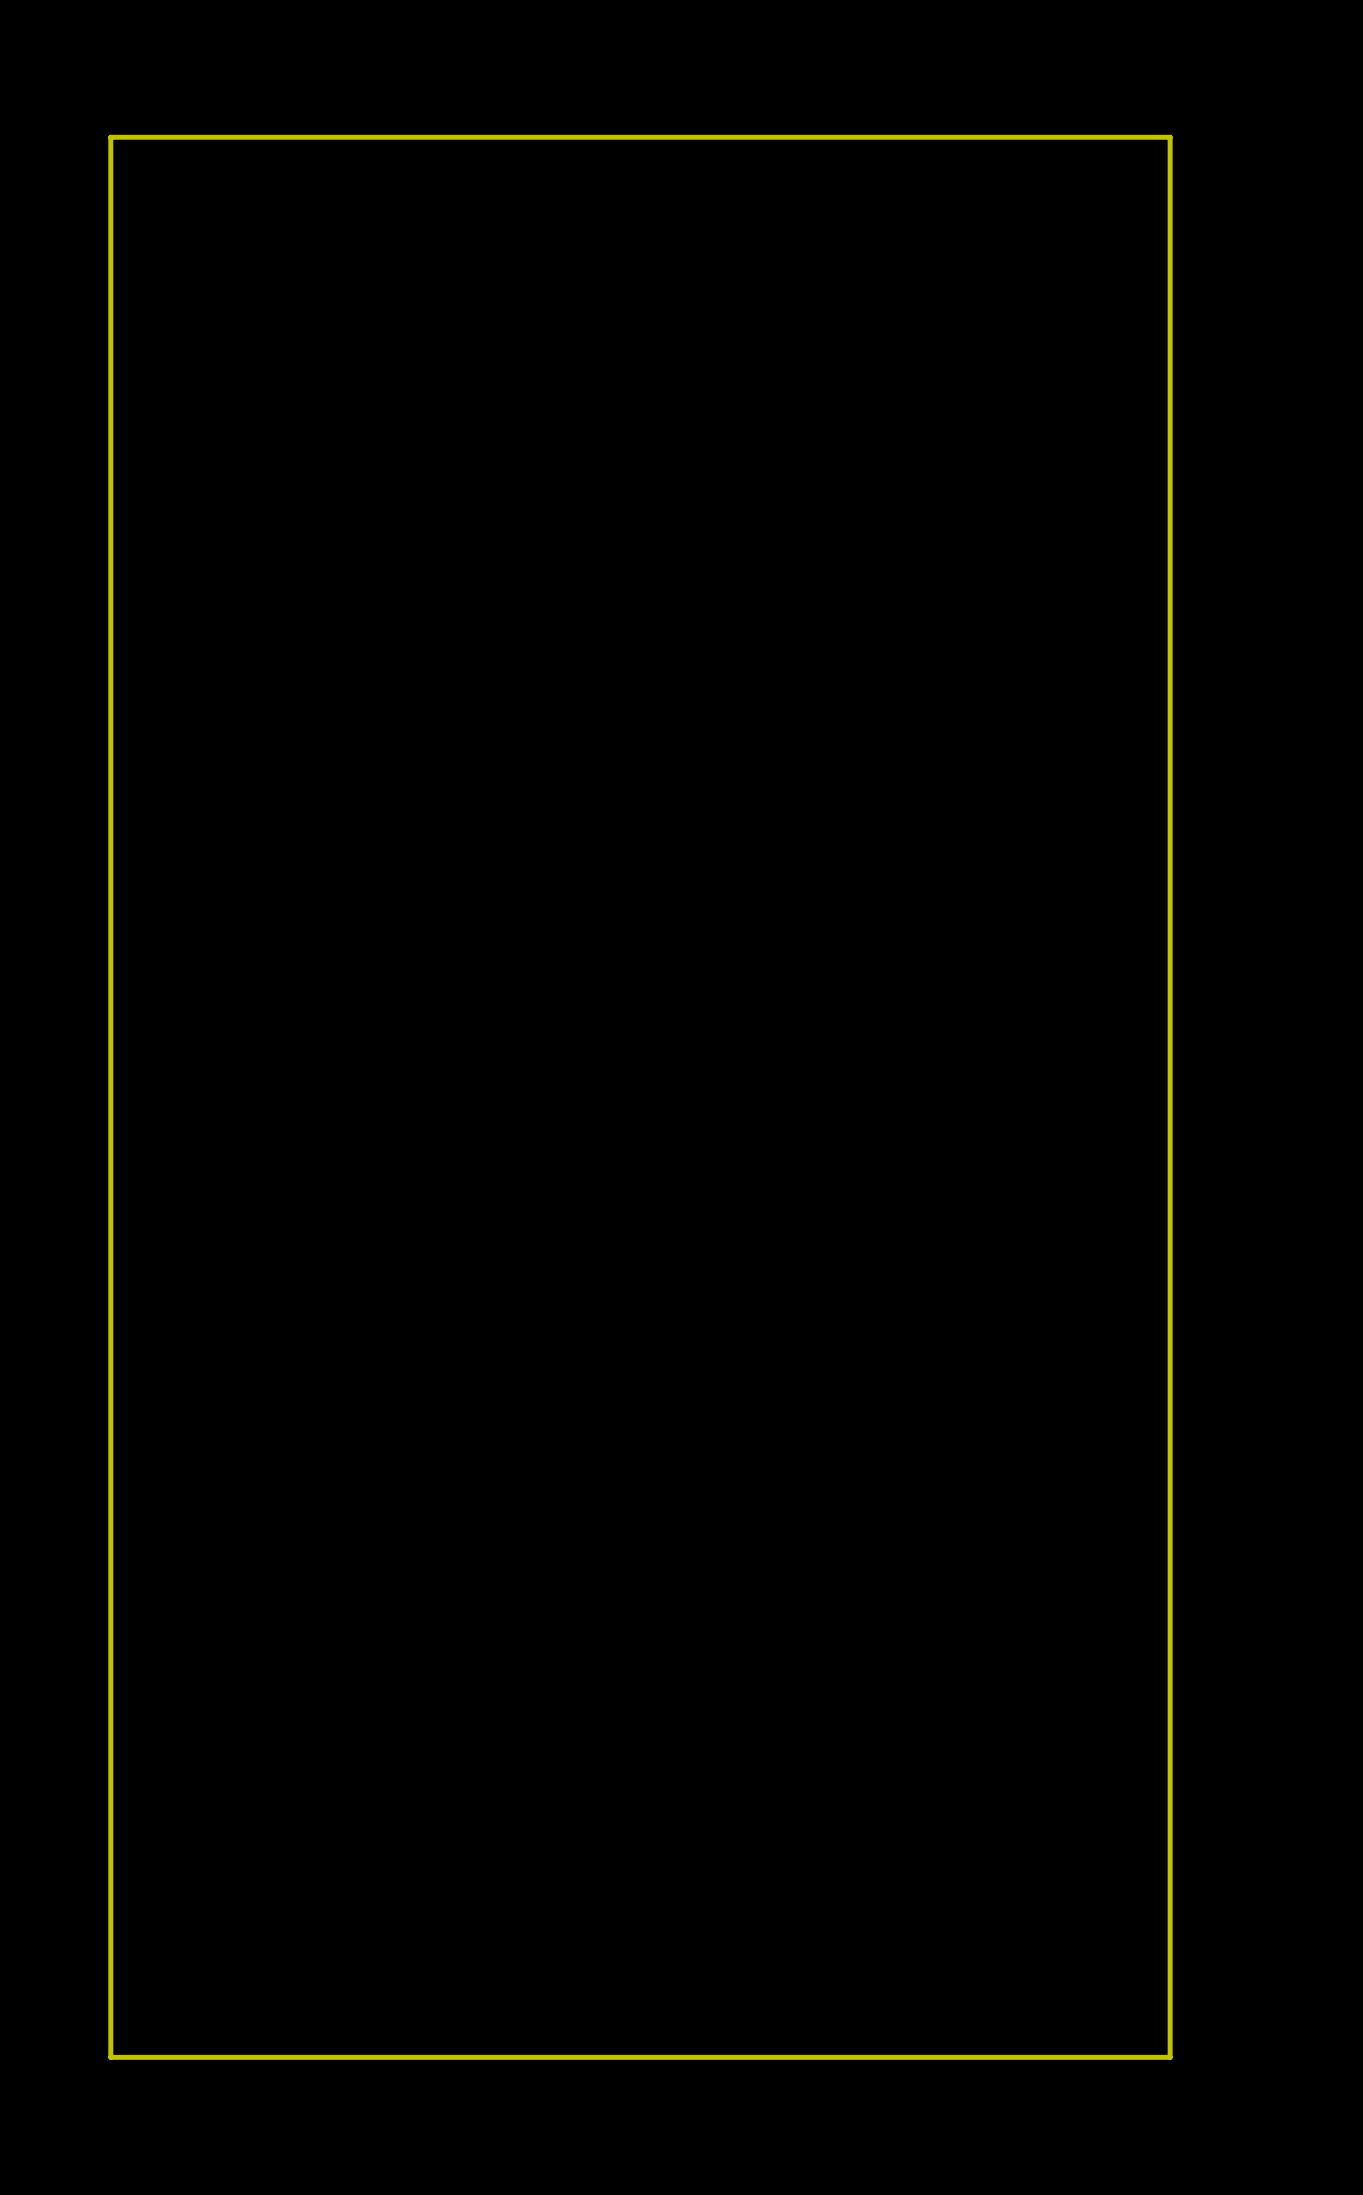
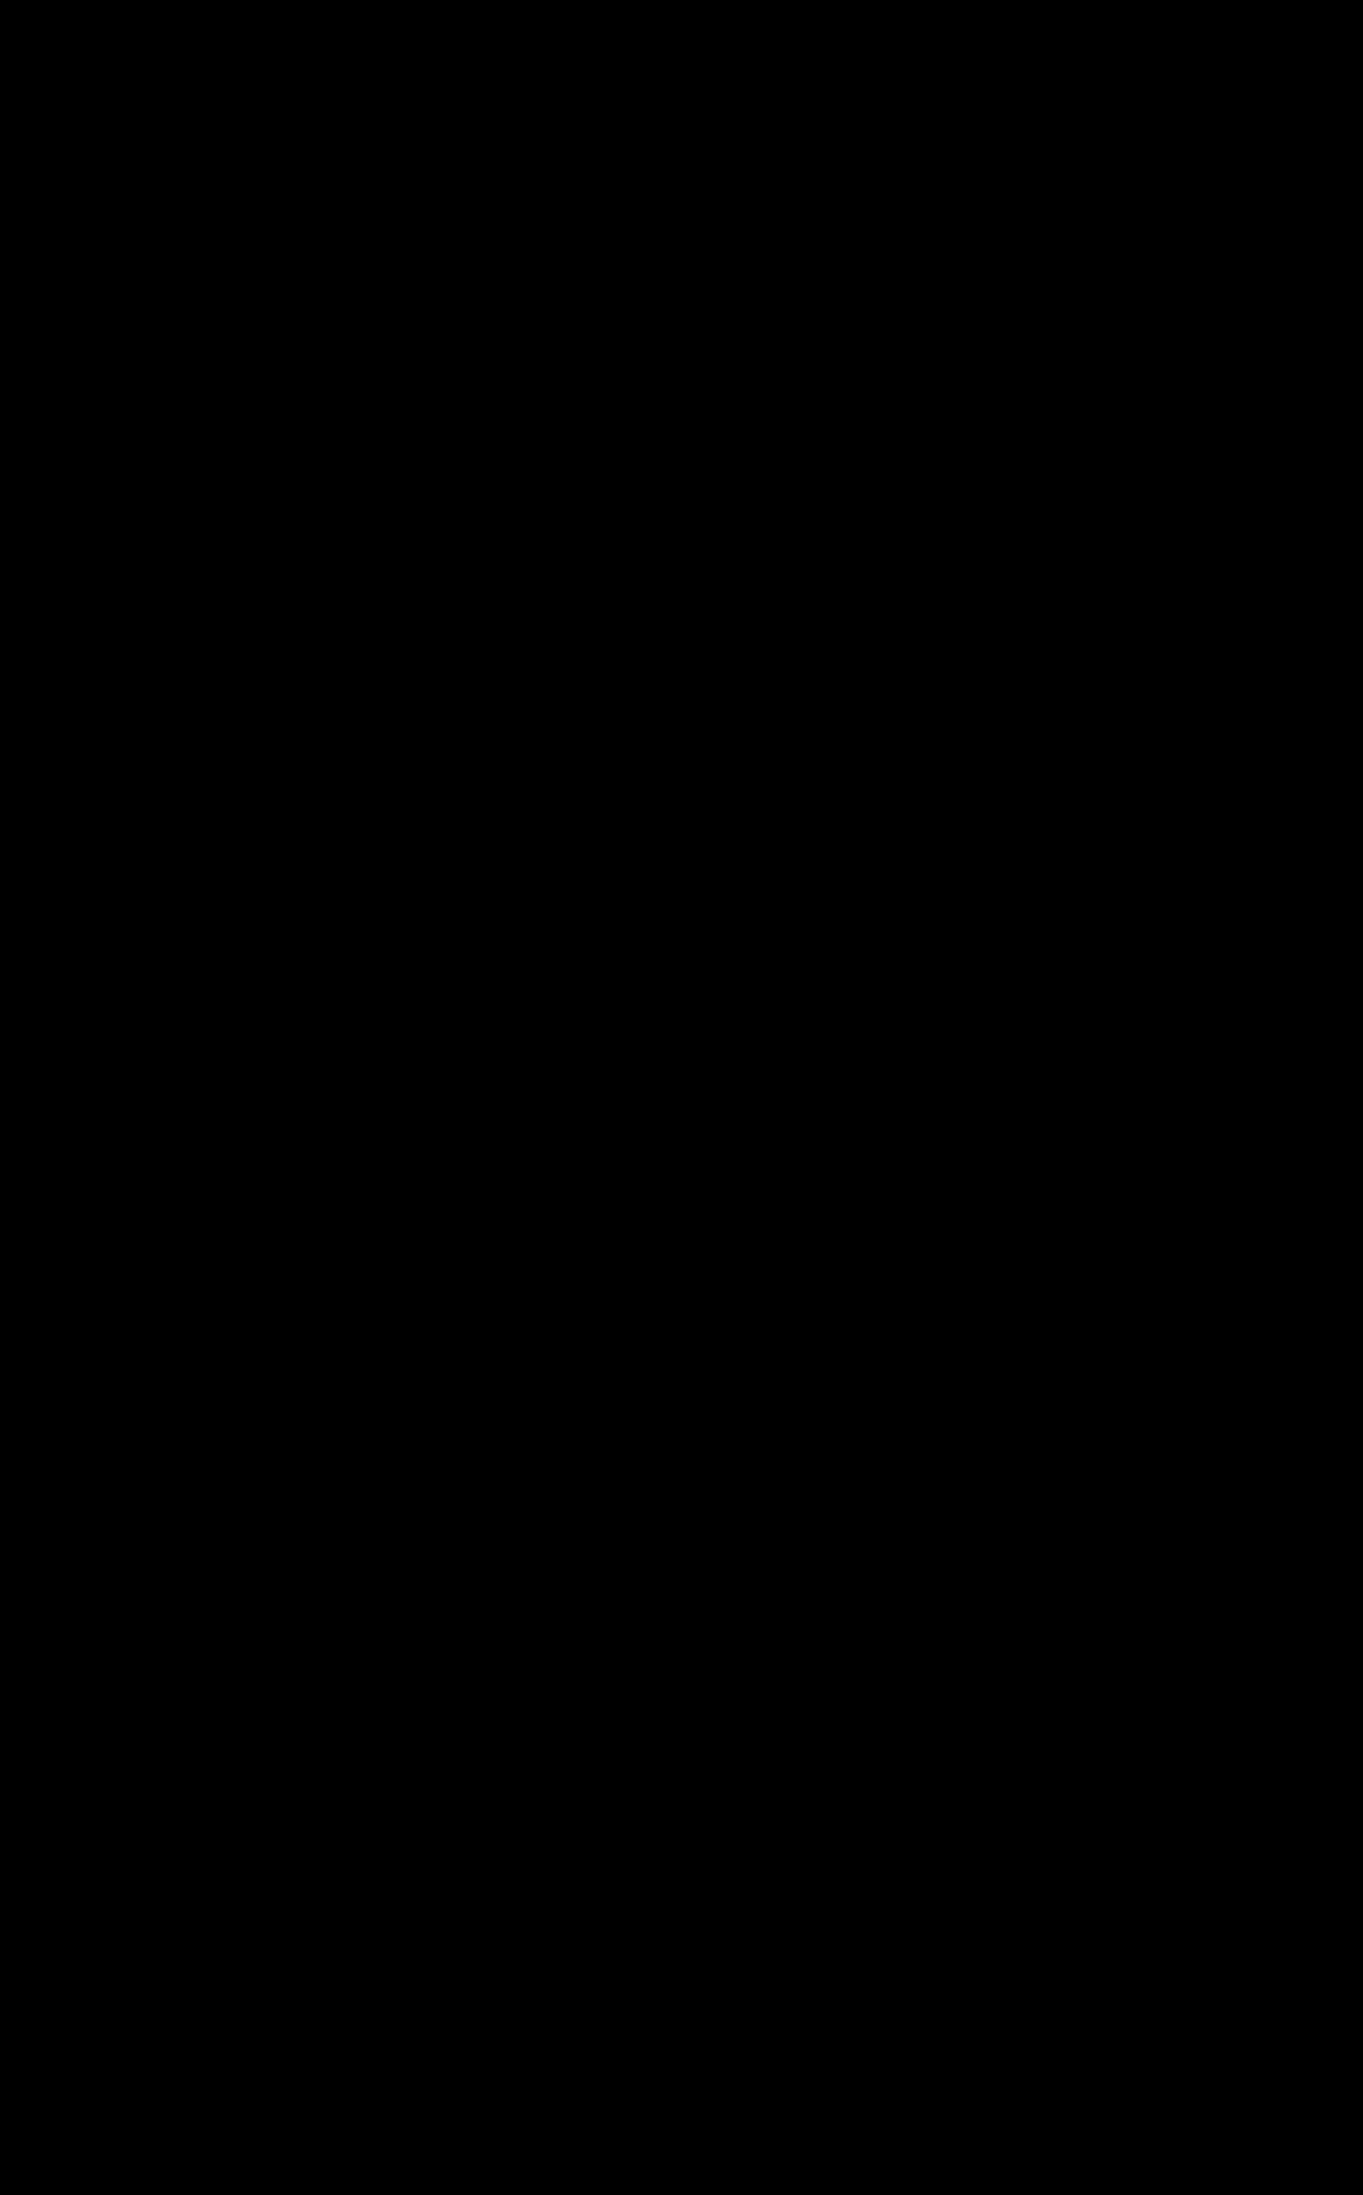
board edge: (1170, 137) (1170, 2057) (110, 2057) (110, 137) (1170, 137) -> none

